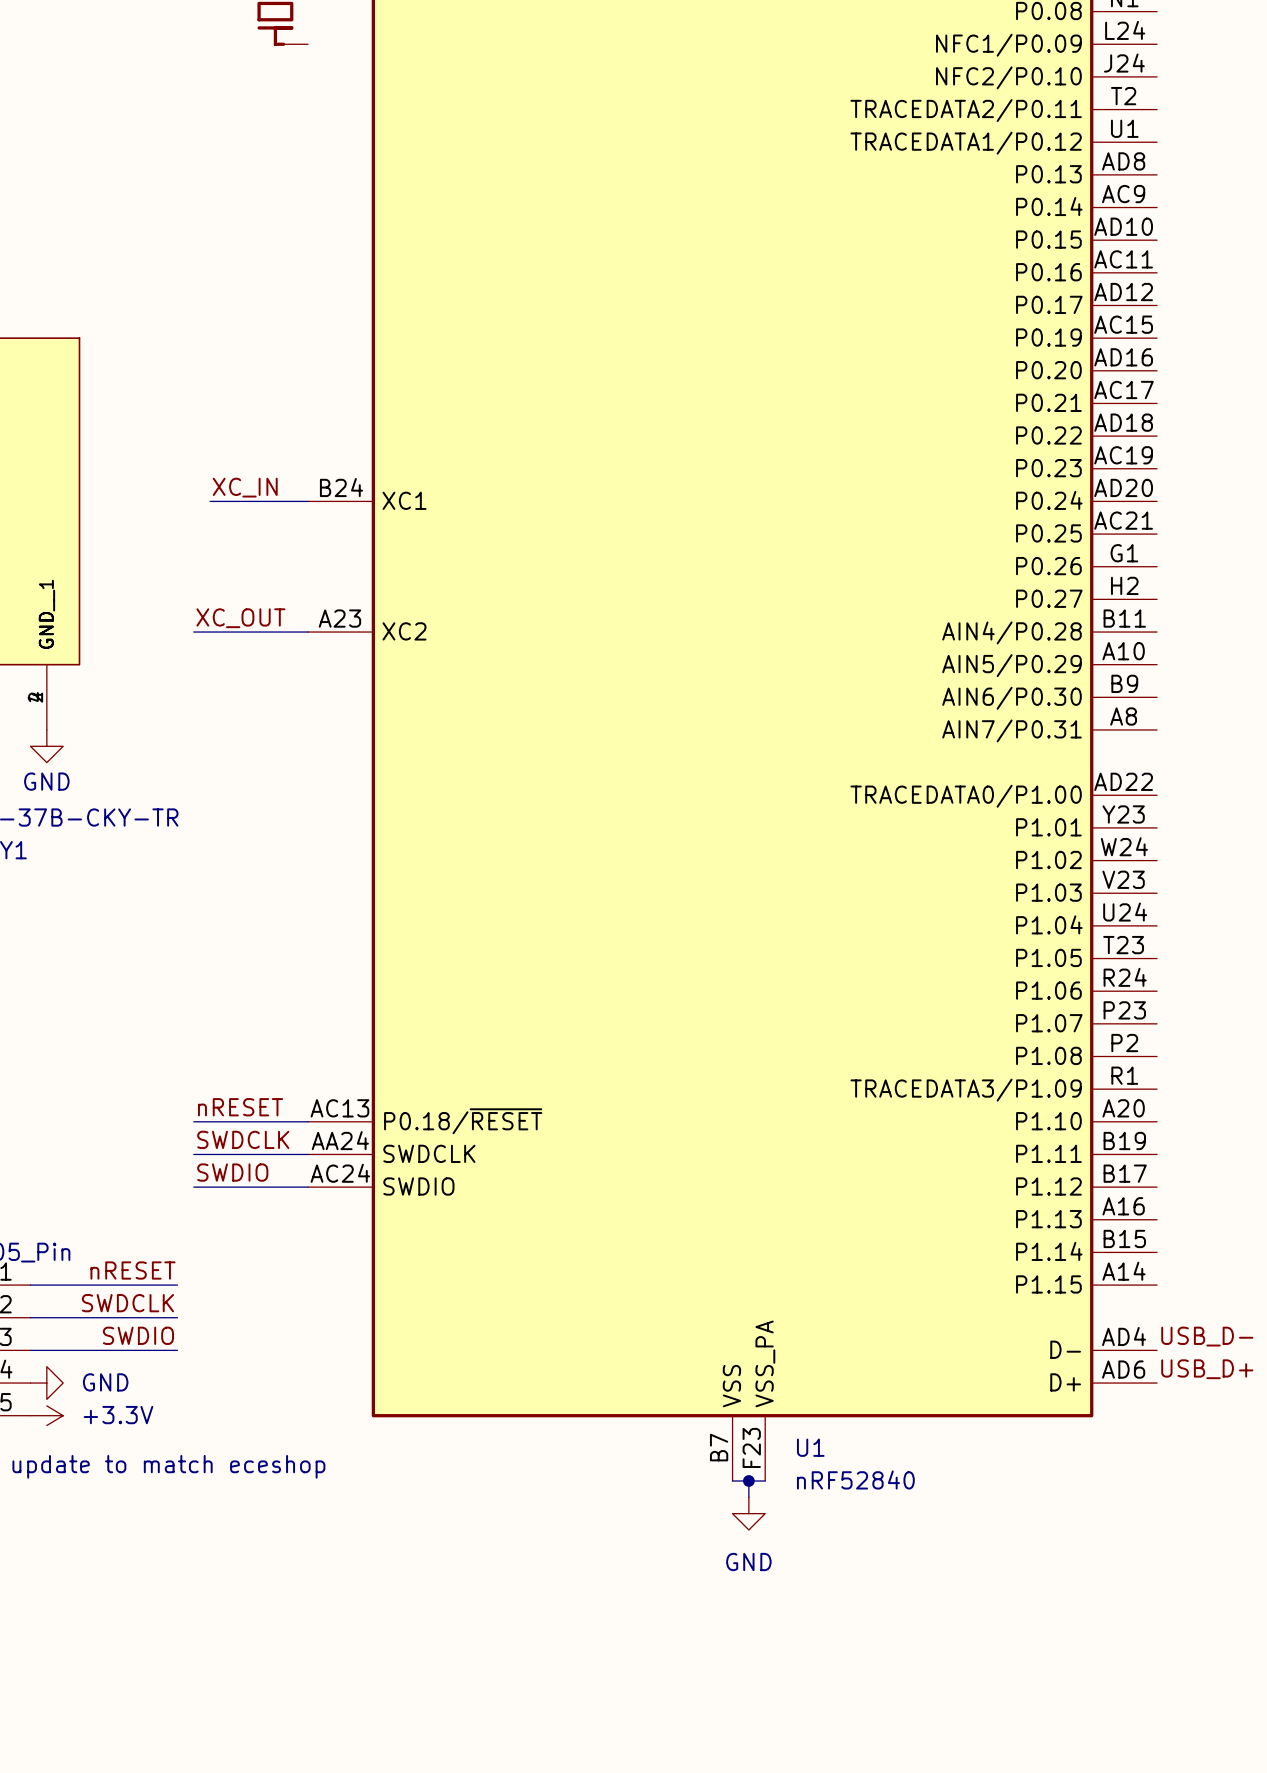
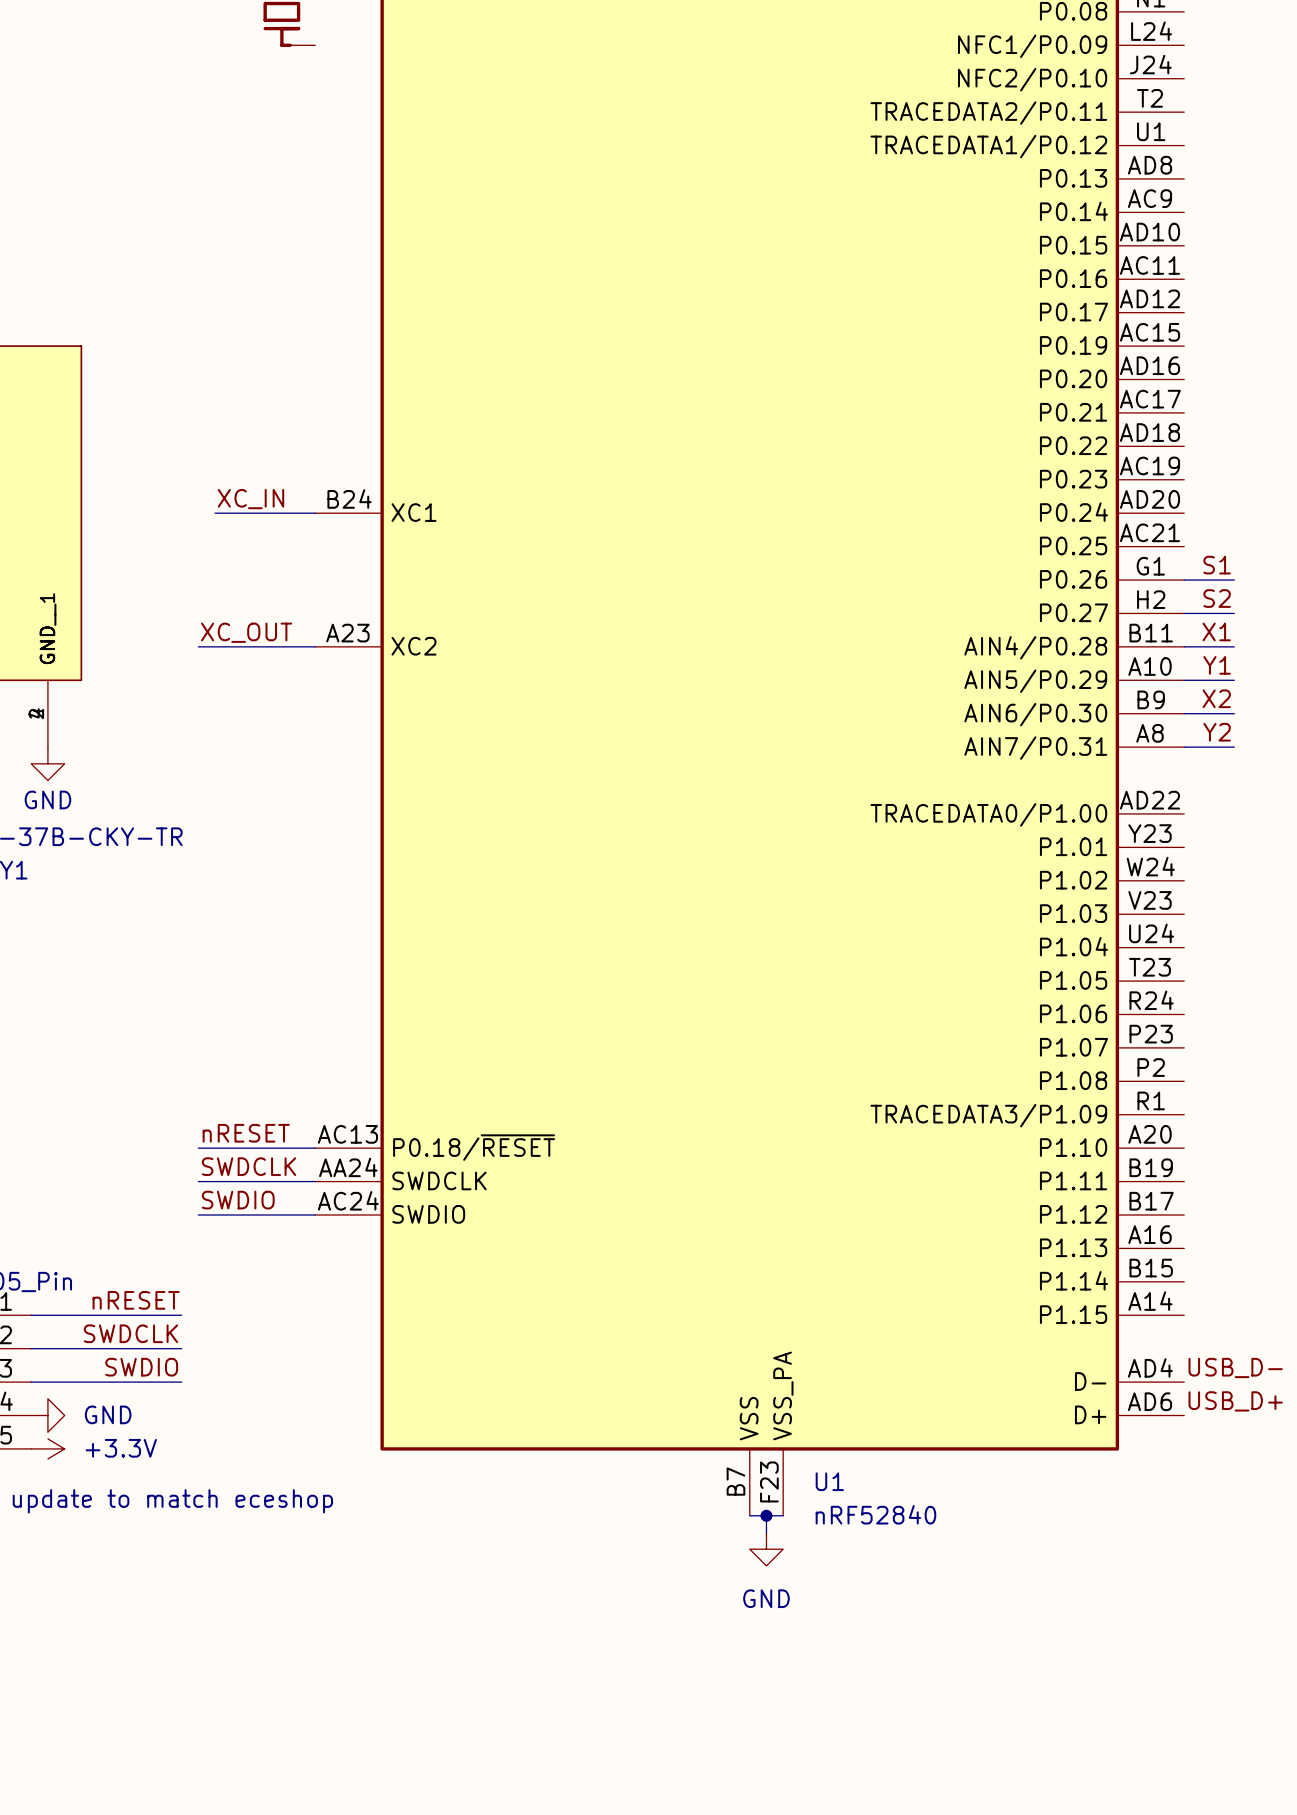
label: none -> S1 (1217, 565)
wire: none -> (1184, 580) (1234, 580)
label: none -> S2 (1217, 598)
wire: none -> (1184, 613) (1234, 613)
label: none -> X1 (1216, 631)
wire: none -> (1184, 646) (1234, 646)
label: none -> Y1 (1217, 665)
wire: none -> (1184, 680) (1234, 680)
label: none -> X2 (1216, 698)
wire: none -> (1184, 713) (1234, 713)
label: none -> Y2 (1217, 732)
wire: none -> (1184, 747) (1234, 747)

